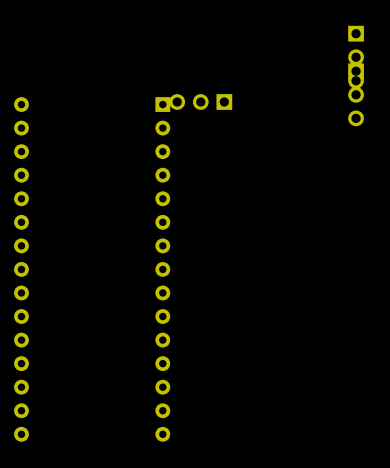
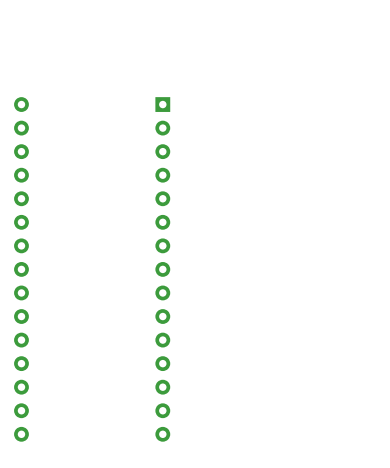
part: (356, 57) -> none
part: (356, 94) -> none
part: (200, 101) -> none

